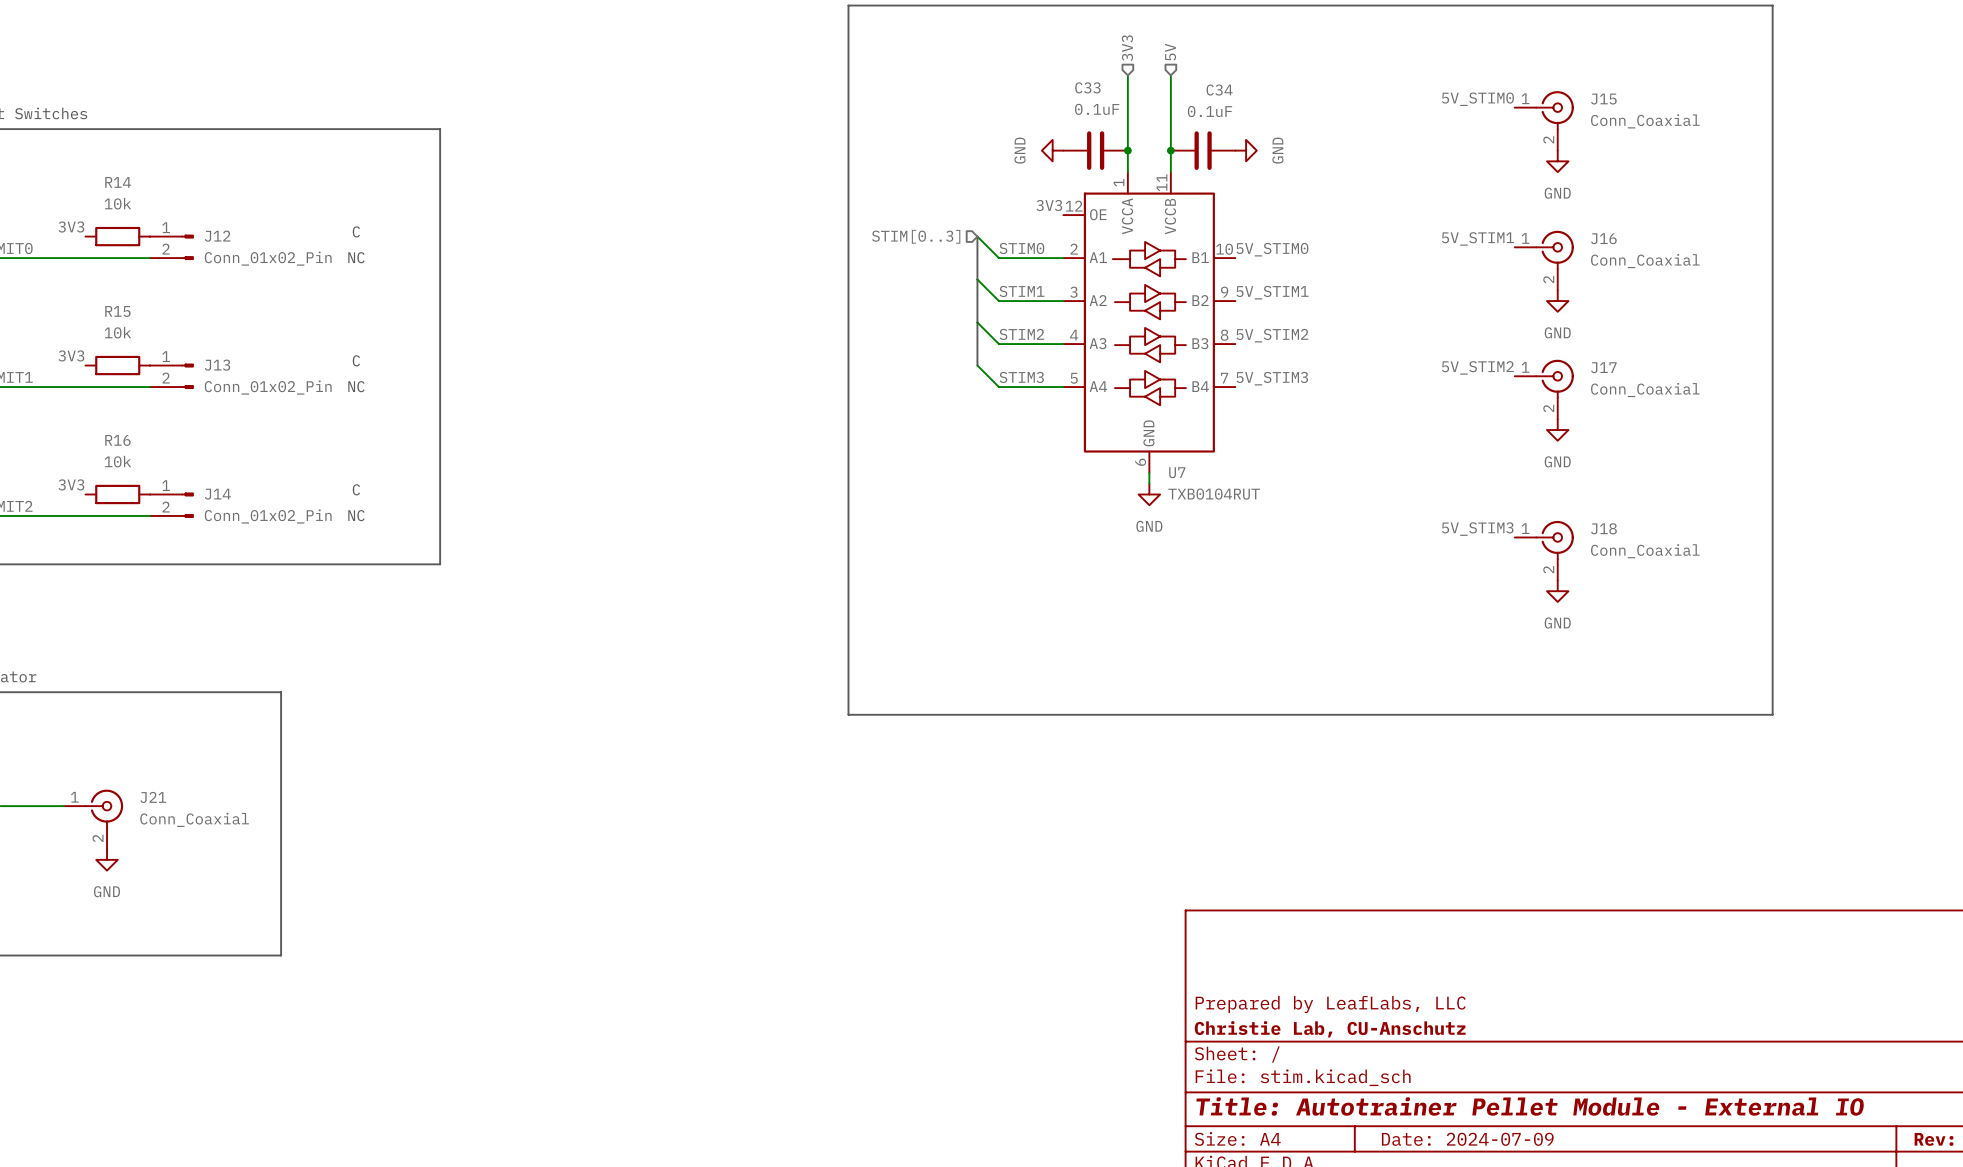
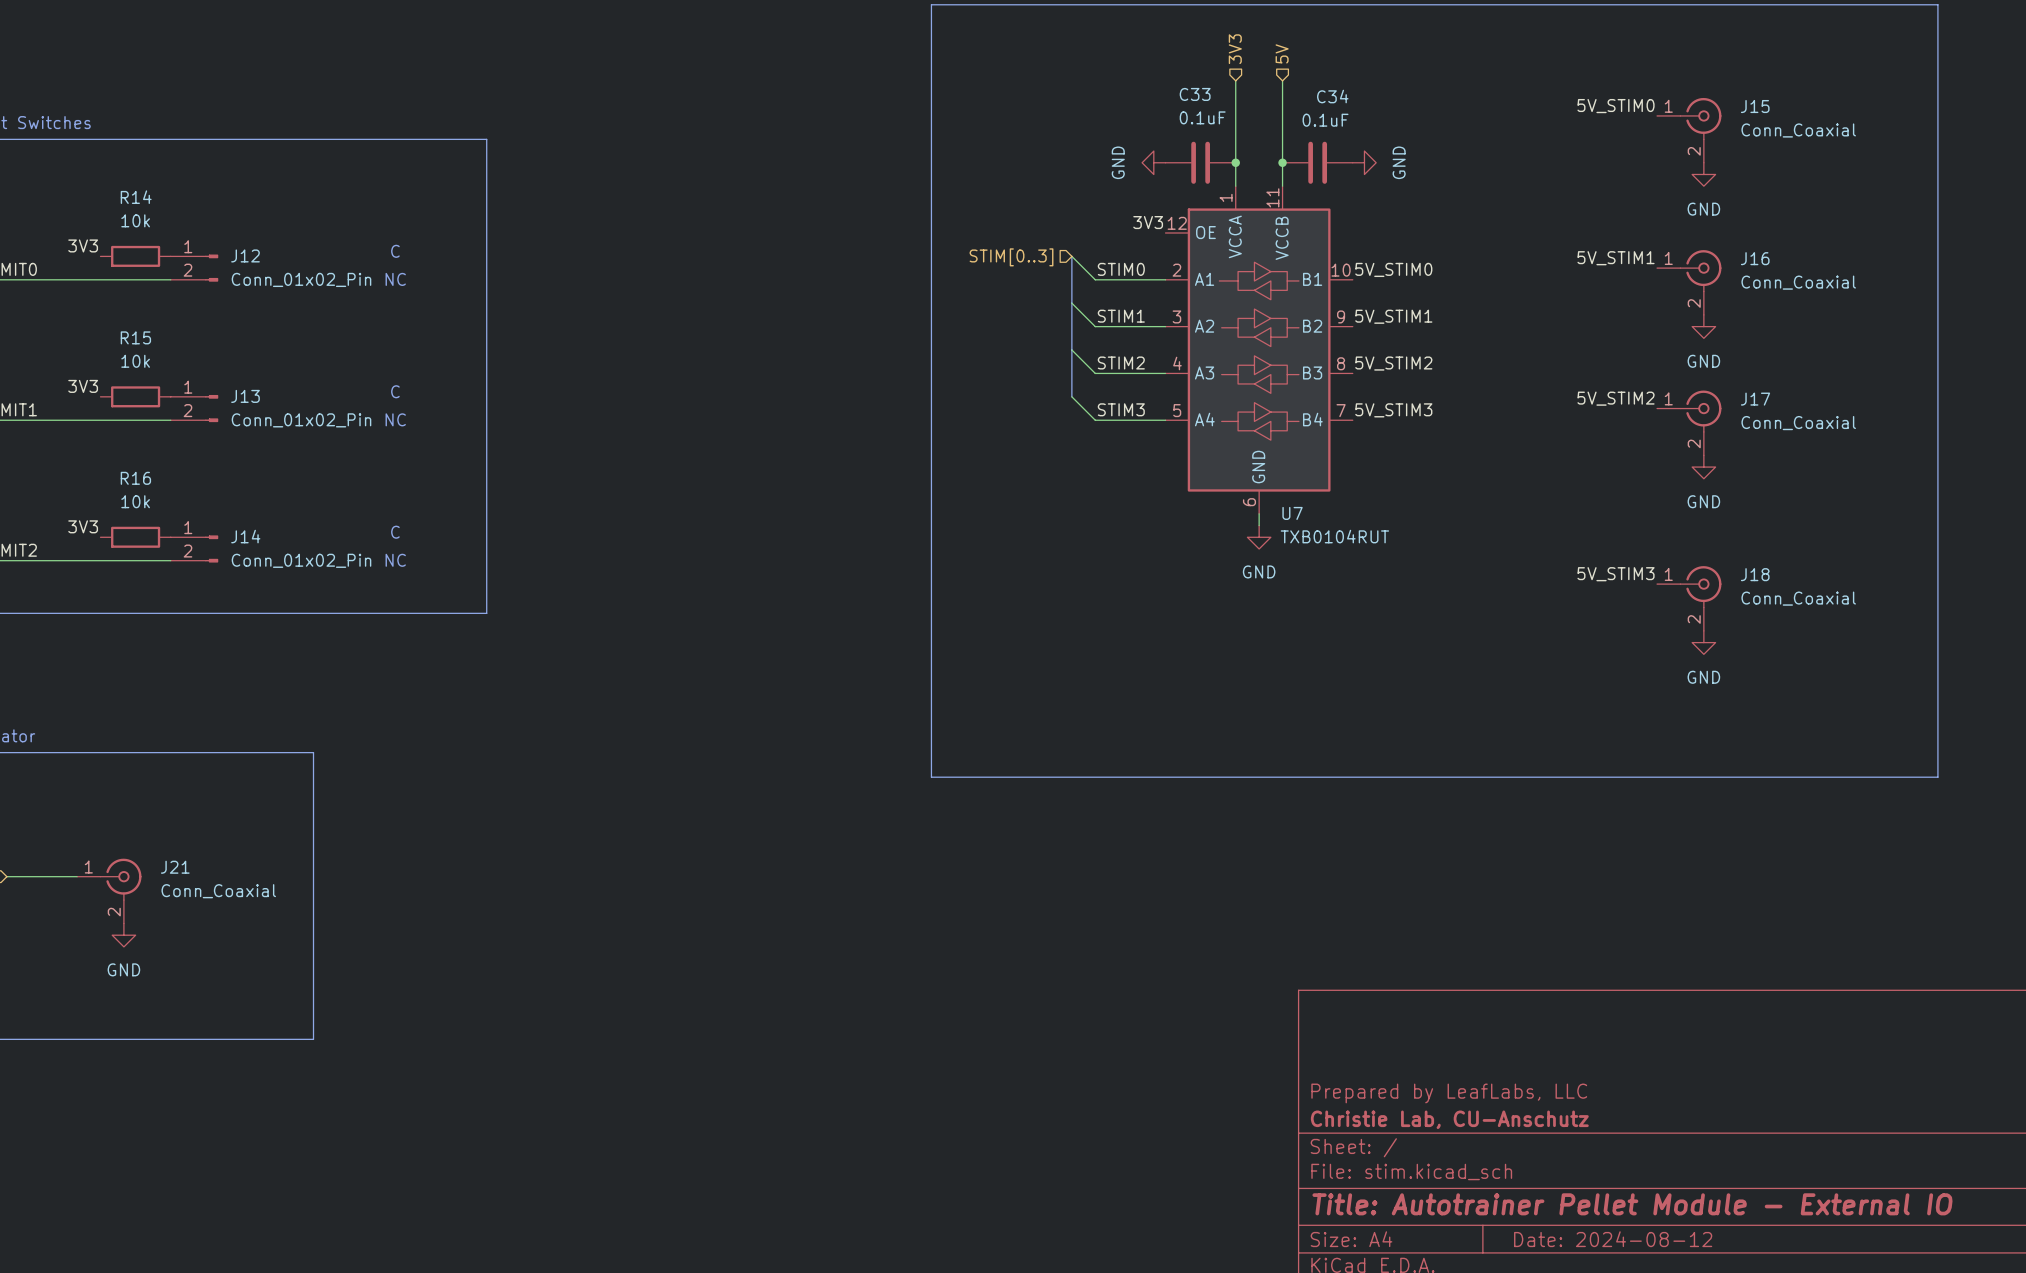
title block: Date: 2024-07-09 (1467, 1139) -> Date: 2024-08-12 (1613, 1239)

